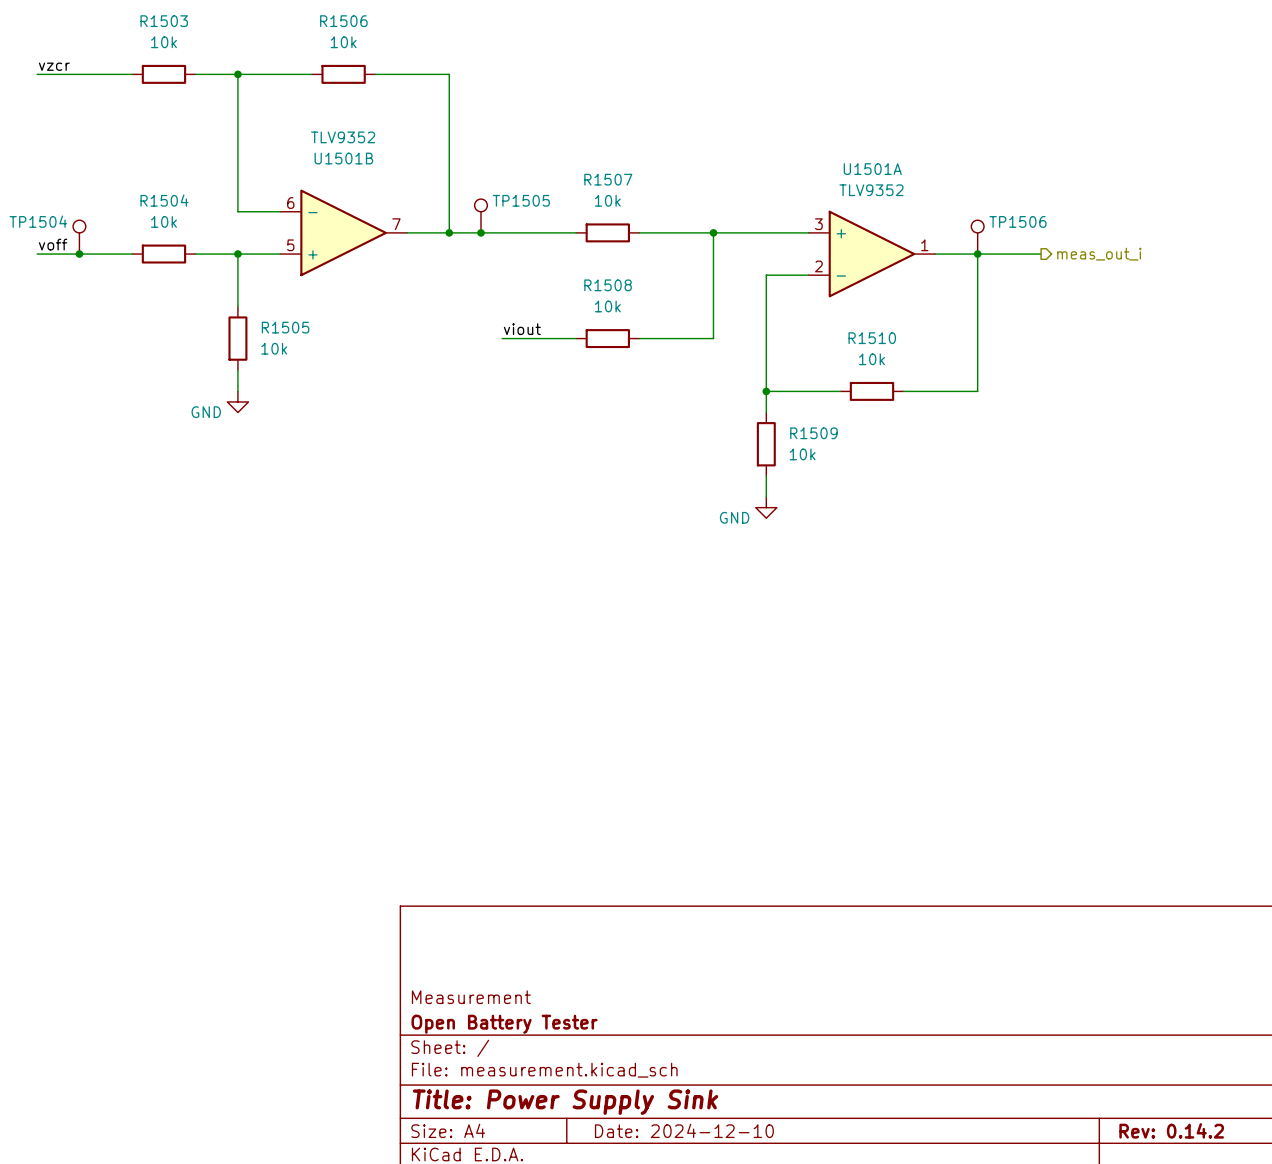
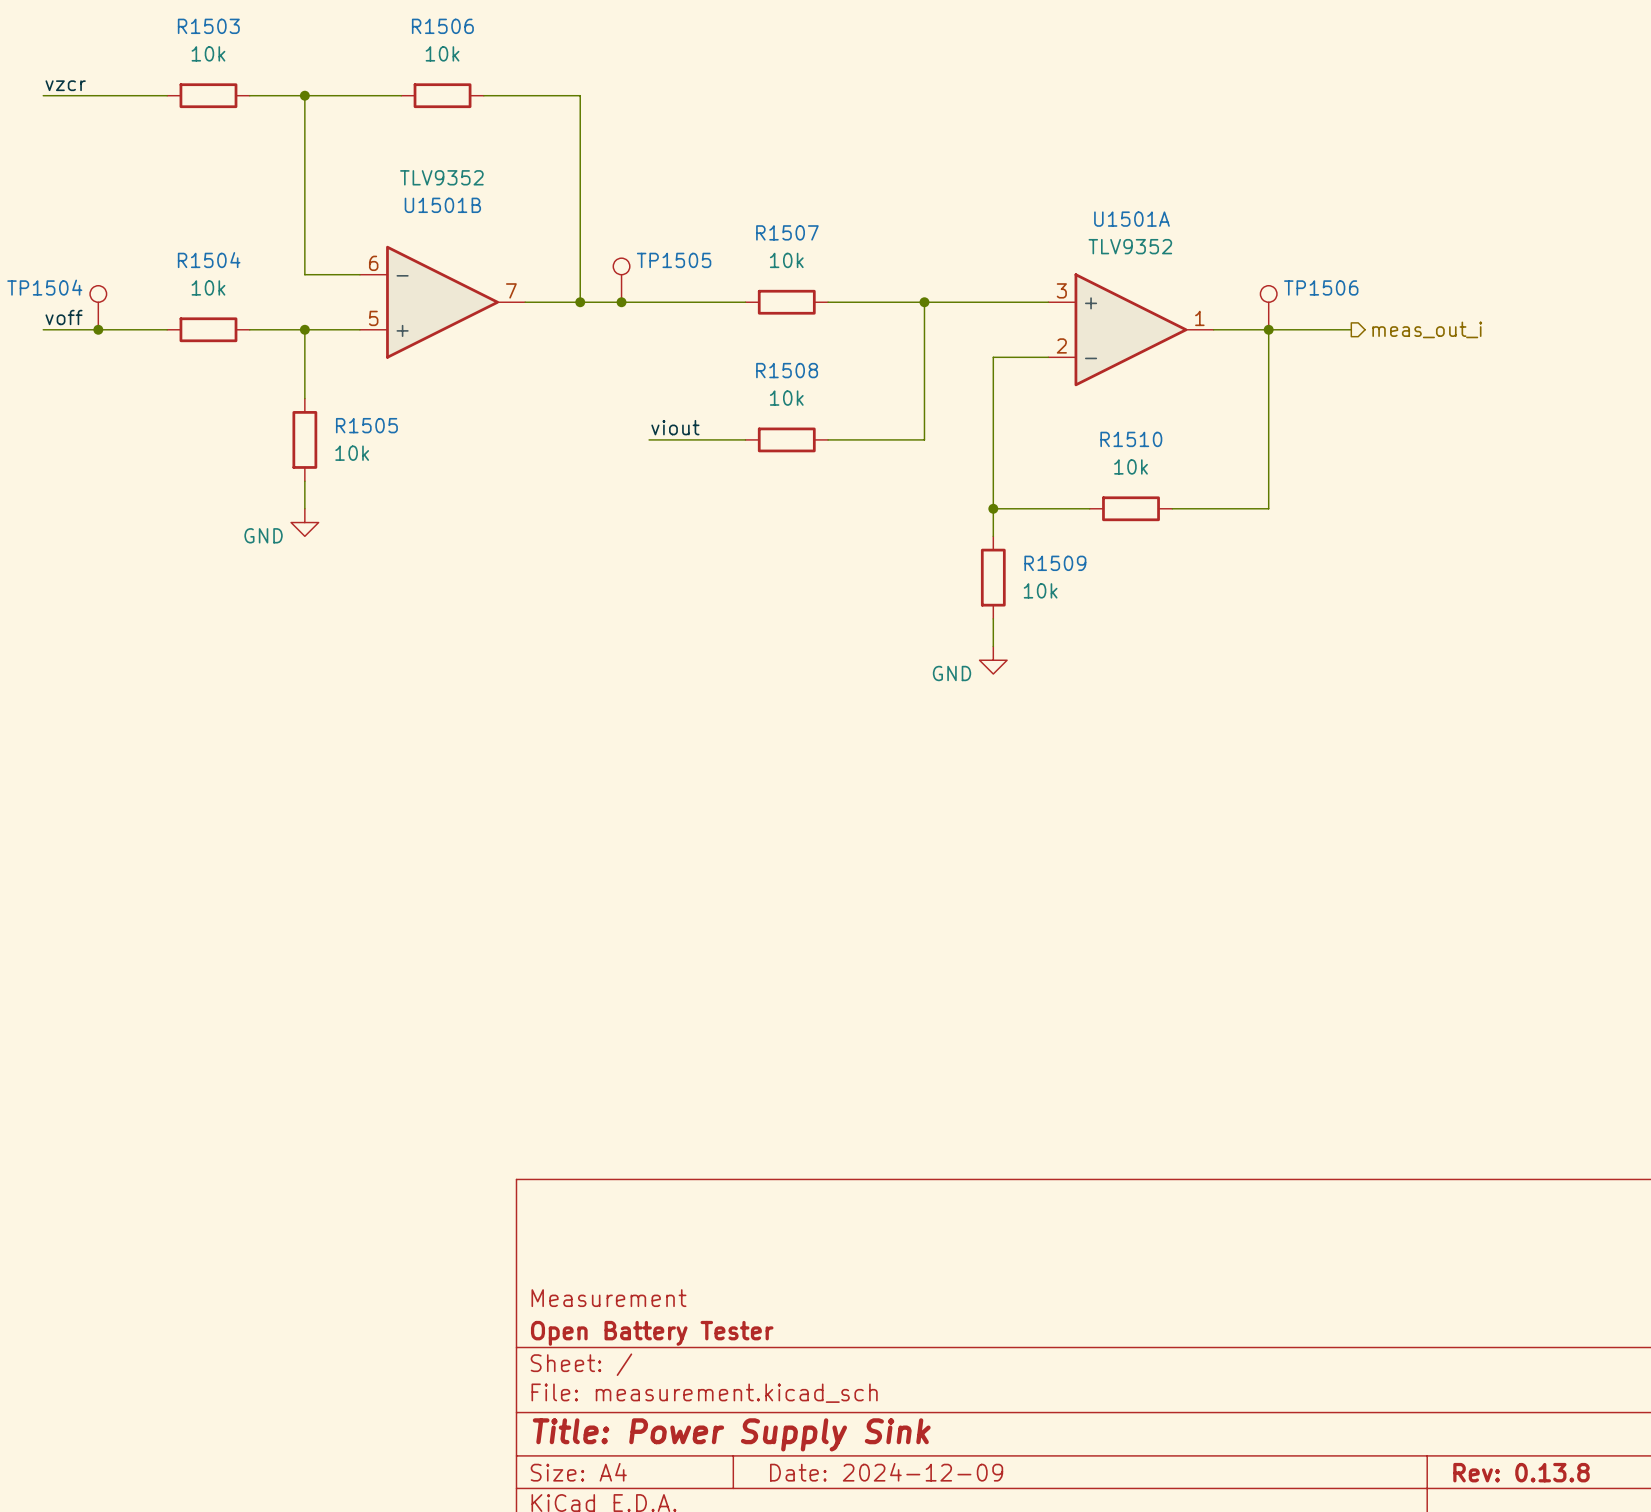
title block: Date: 2024-12-10 (684, 1130) -> Date: 2024-12-09 (886, 1472)
title block: Rev: 0.14.2 (1171, 1130) -> Rev: 0.13.8 (1521, 1472)

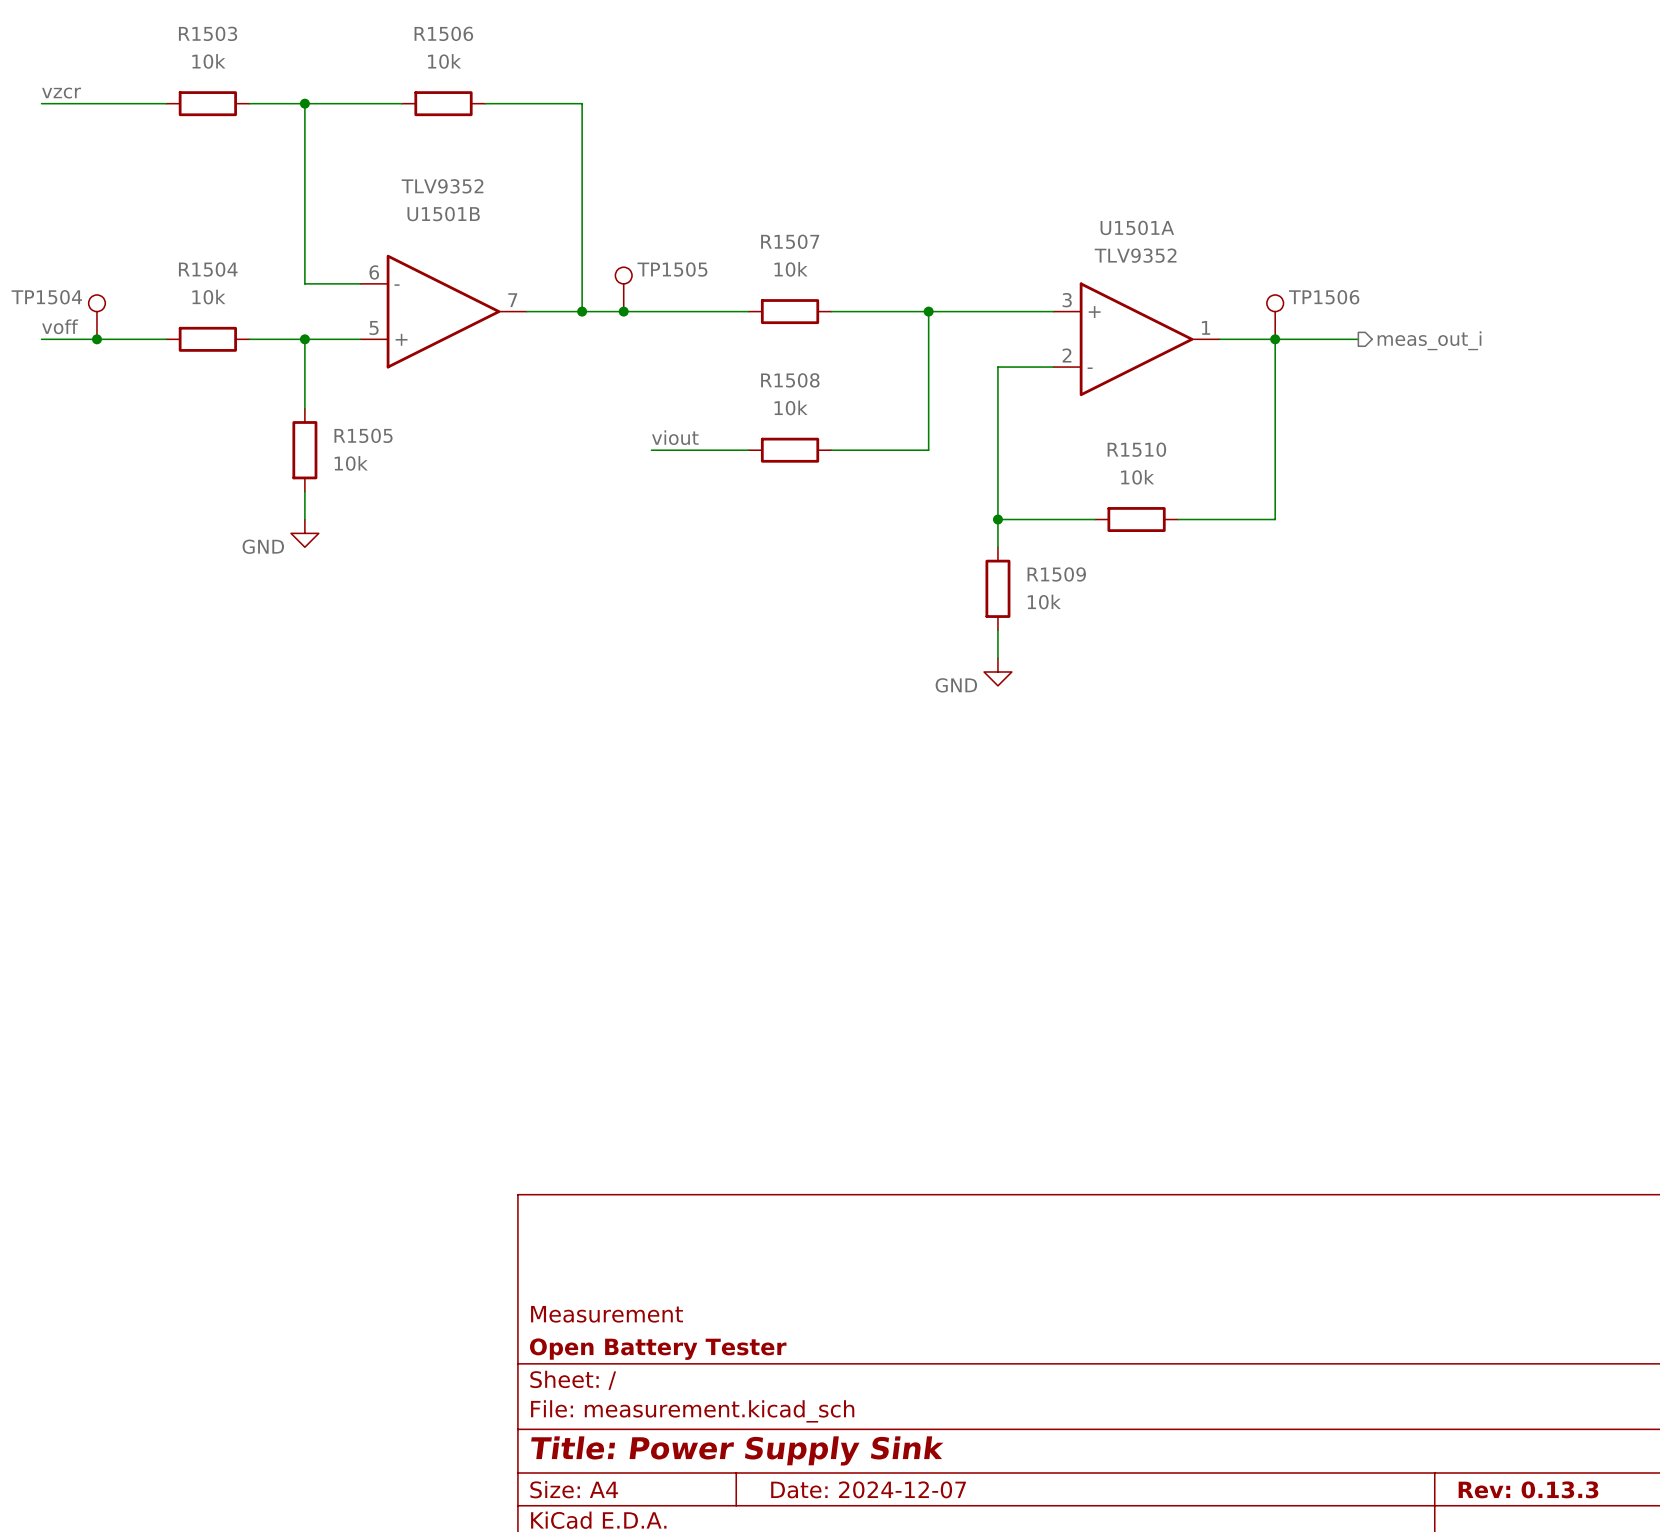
title block: Date: 2024-12-09 (886, 1472) -> Date: 2024-12-07 (868, 1489)
title block: Rev: 0.13.8 (1521, 1472) -> Rev: 0.13.3 (1528, 1489)

